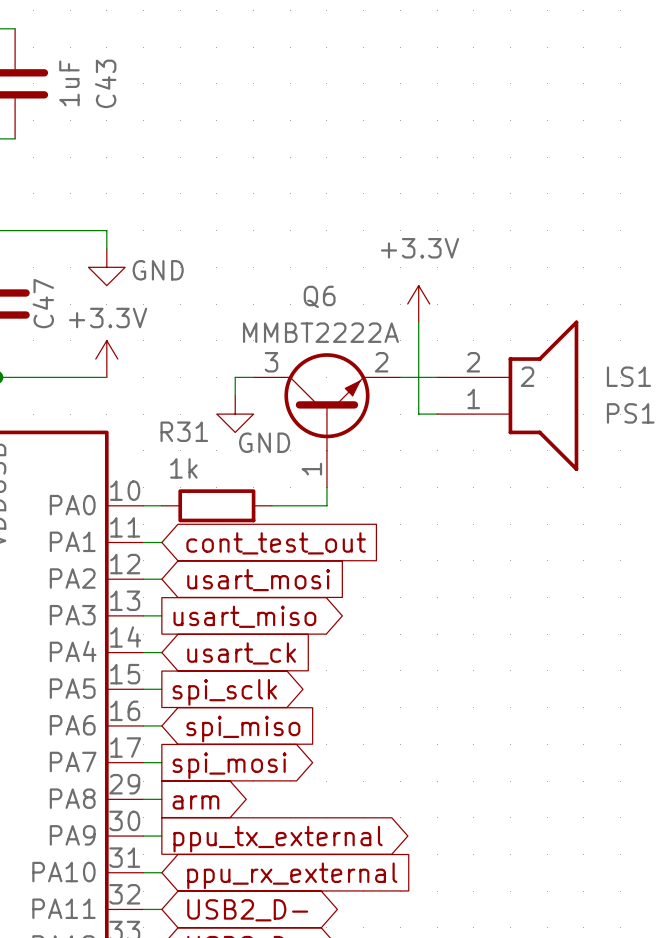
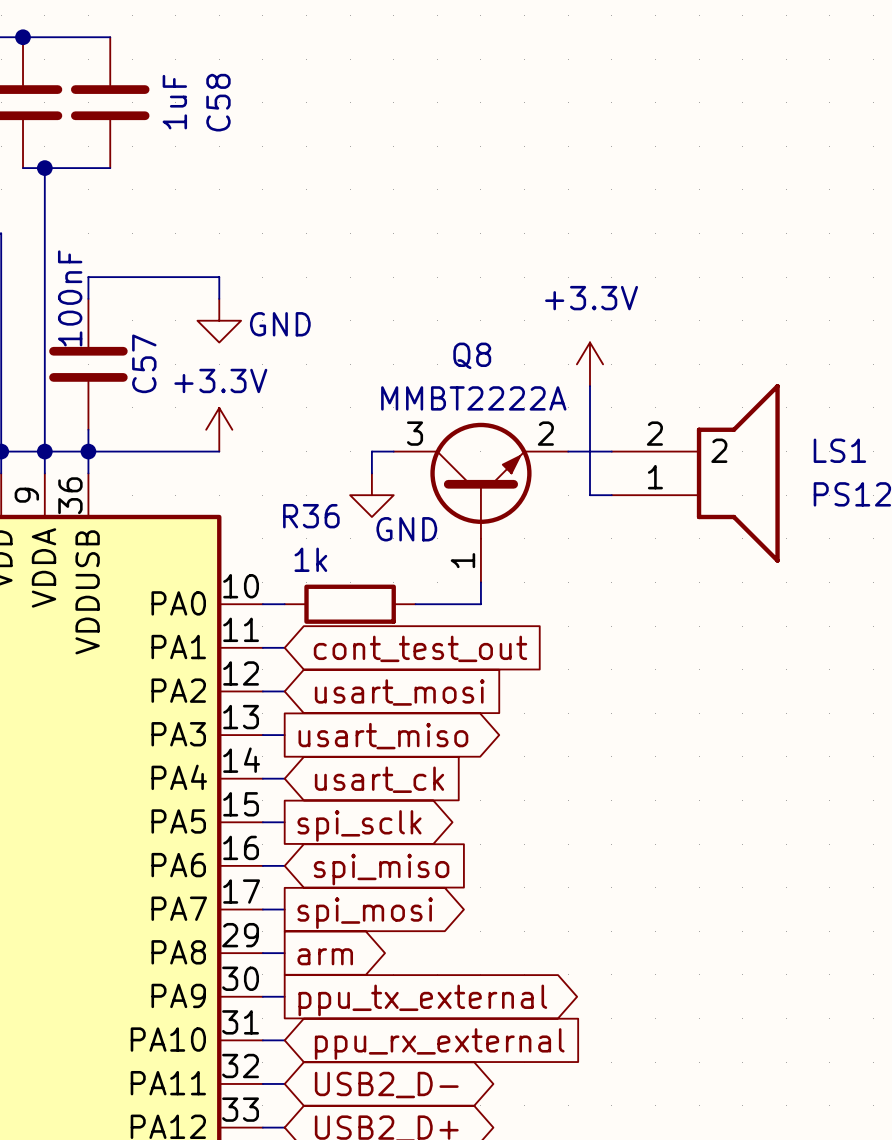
C43 name: C43 (105, 83) -> C58 (218, 102)
Q6 name: Q6 (319, 296) -> Q8 (472, 355)
C47 name: C47 (43, 303) -> C57 (144, 363)
R31 name: R31 (184, 431) -> R36 (311, 516)

